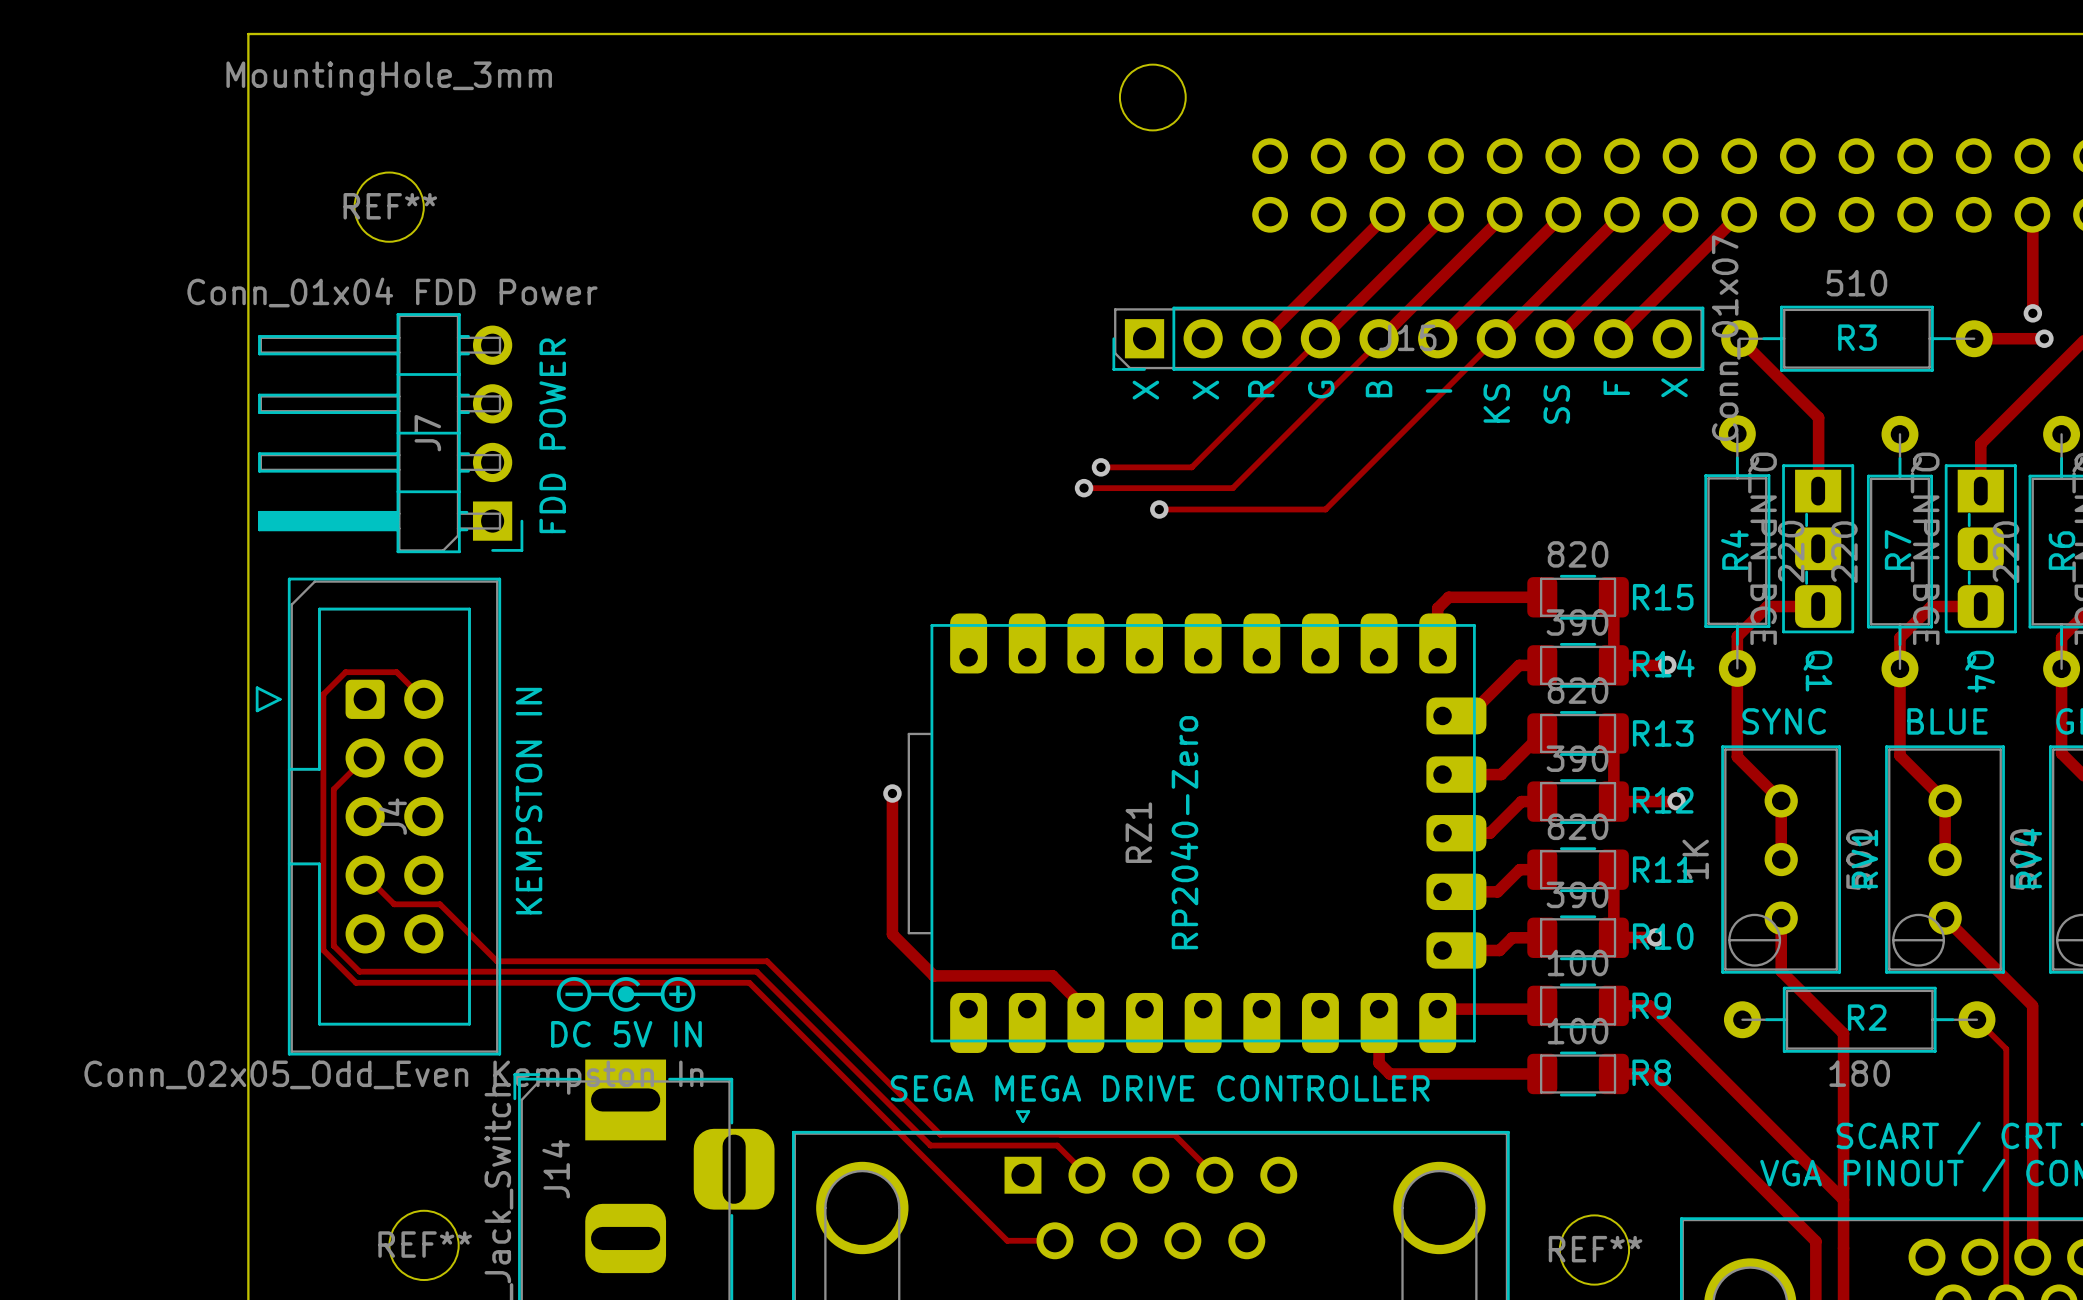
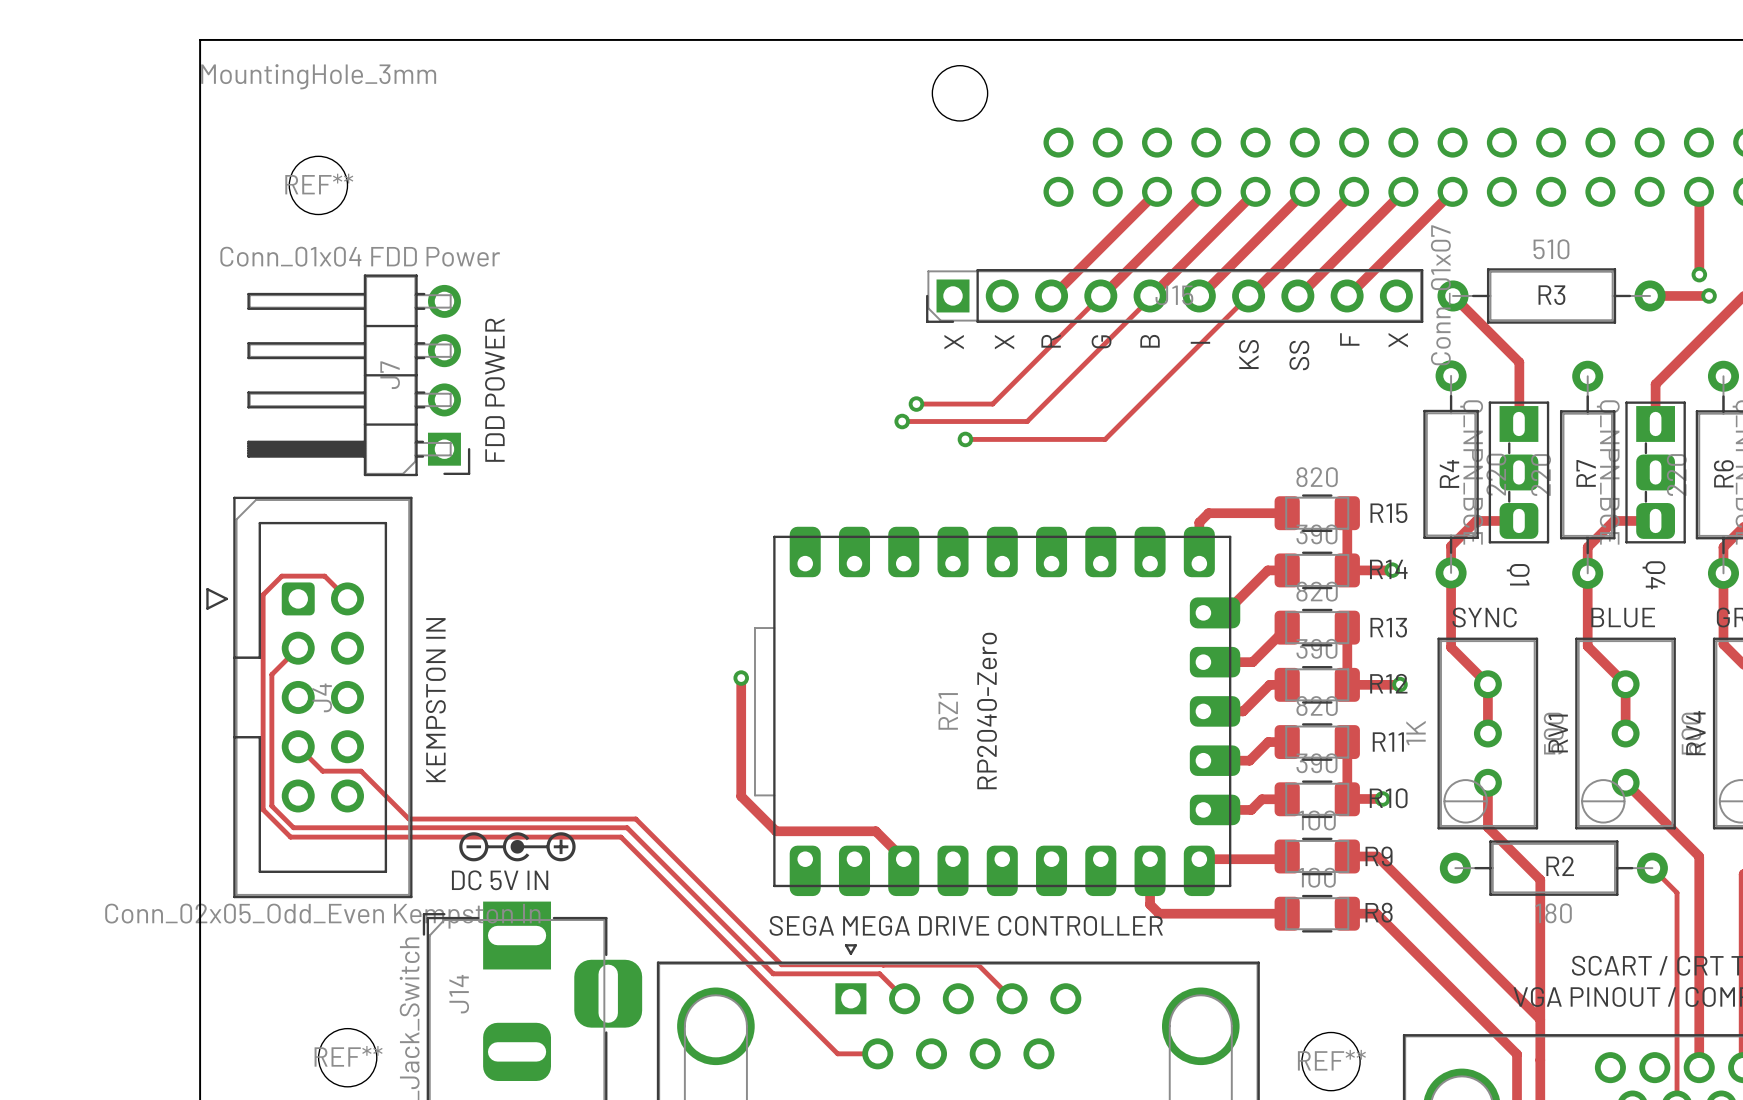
J7 position: (390, 433) -> (358, 375)
text position: FDD POWER (552, 435) -> FDD POWER (494, 390)

